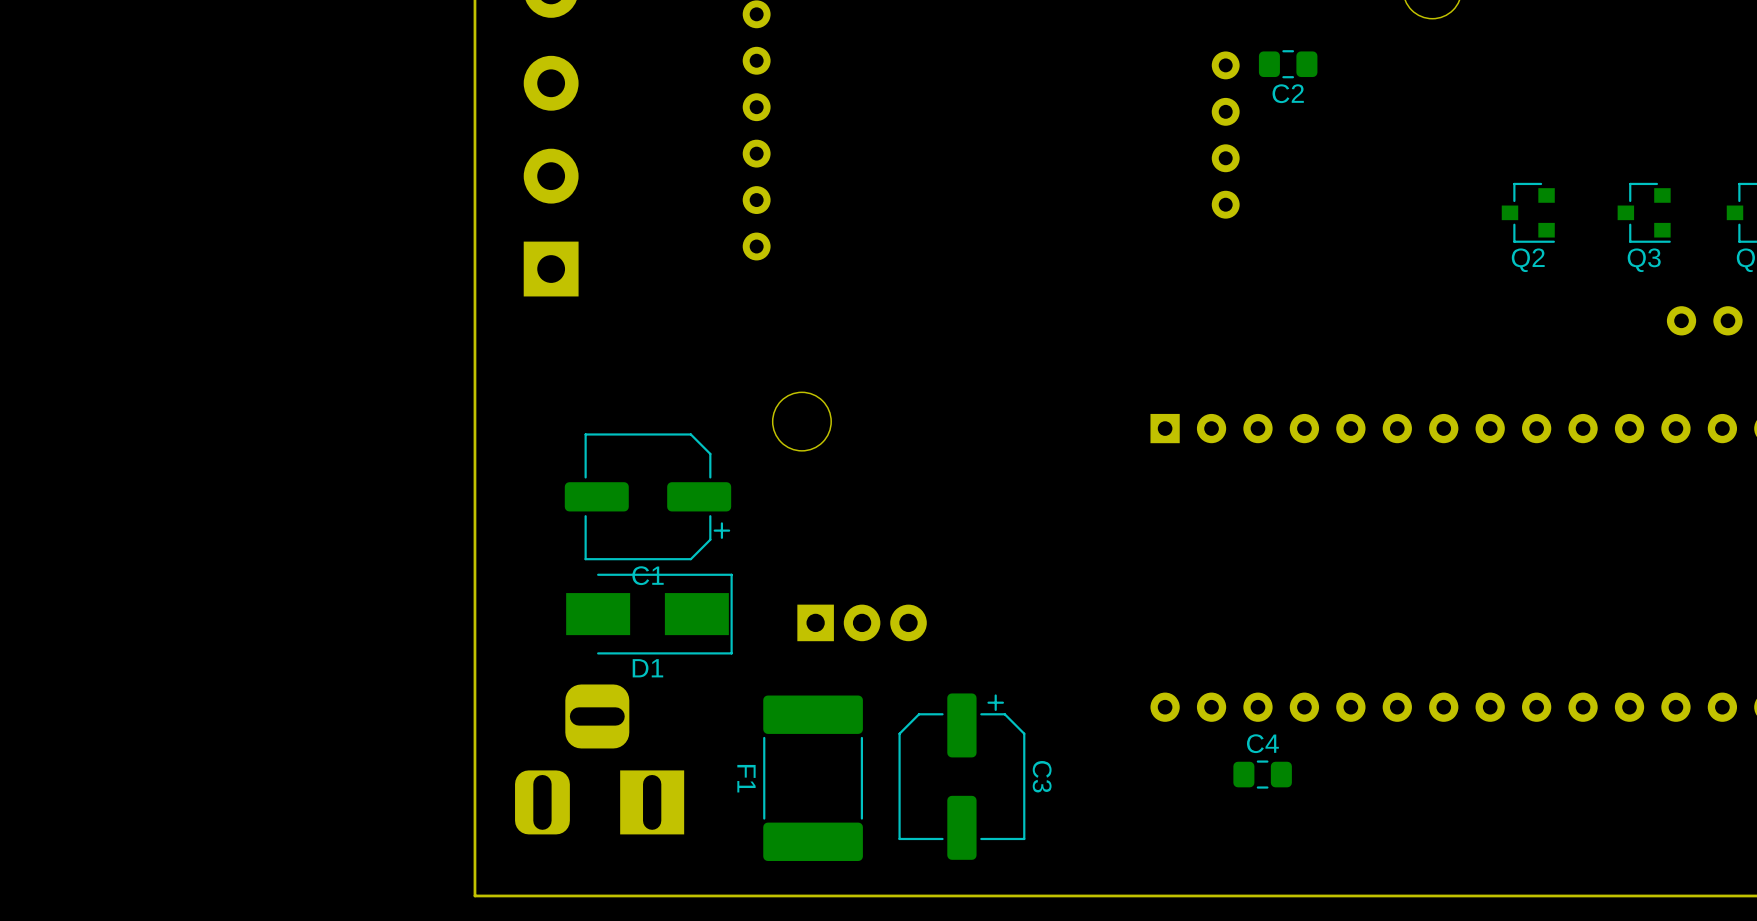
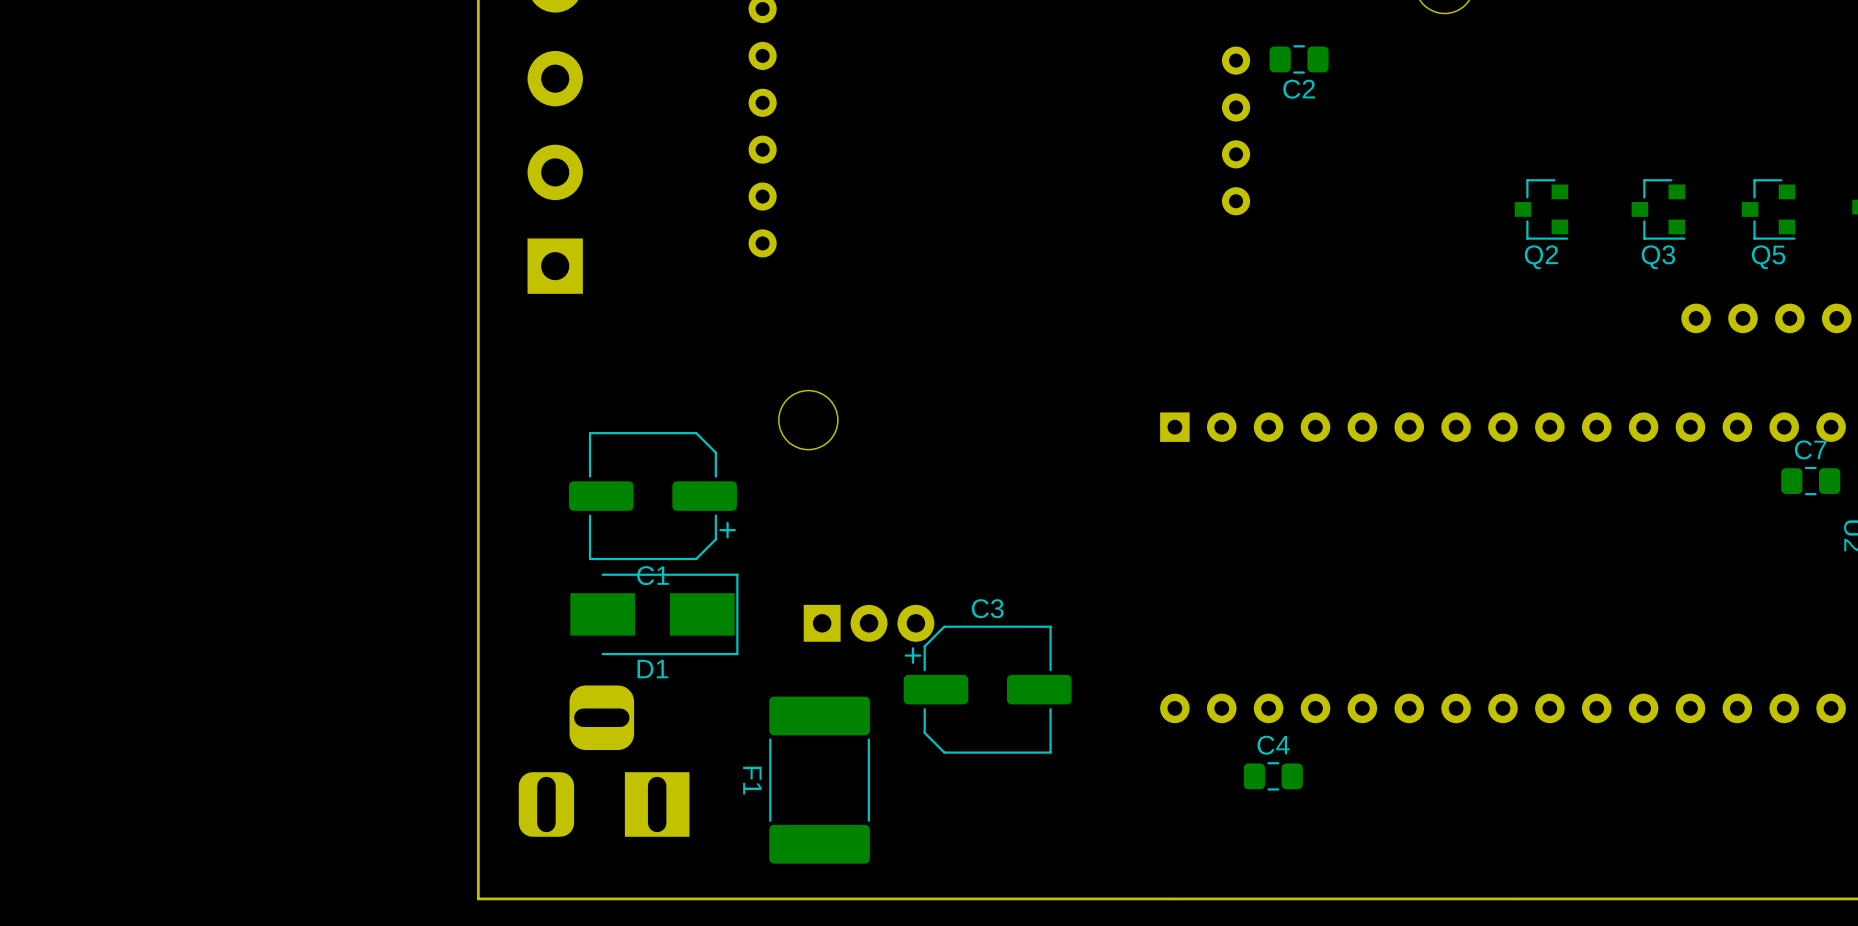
C3 footprint: [898, 693, 1026, 860] -> [903, 625, 1072, 754]
C3 name position: C3 (1042, 776) -> C3 (987, 608)

